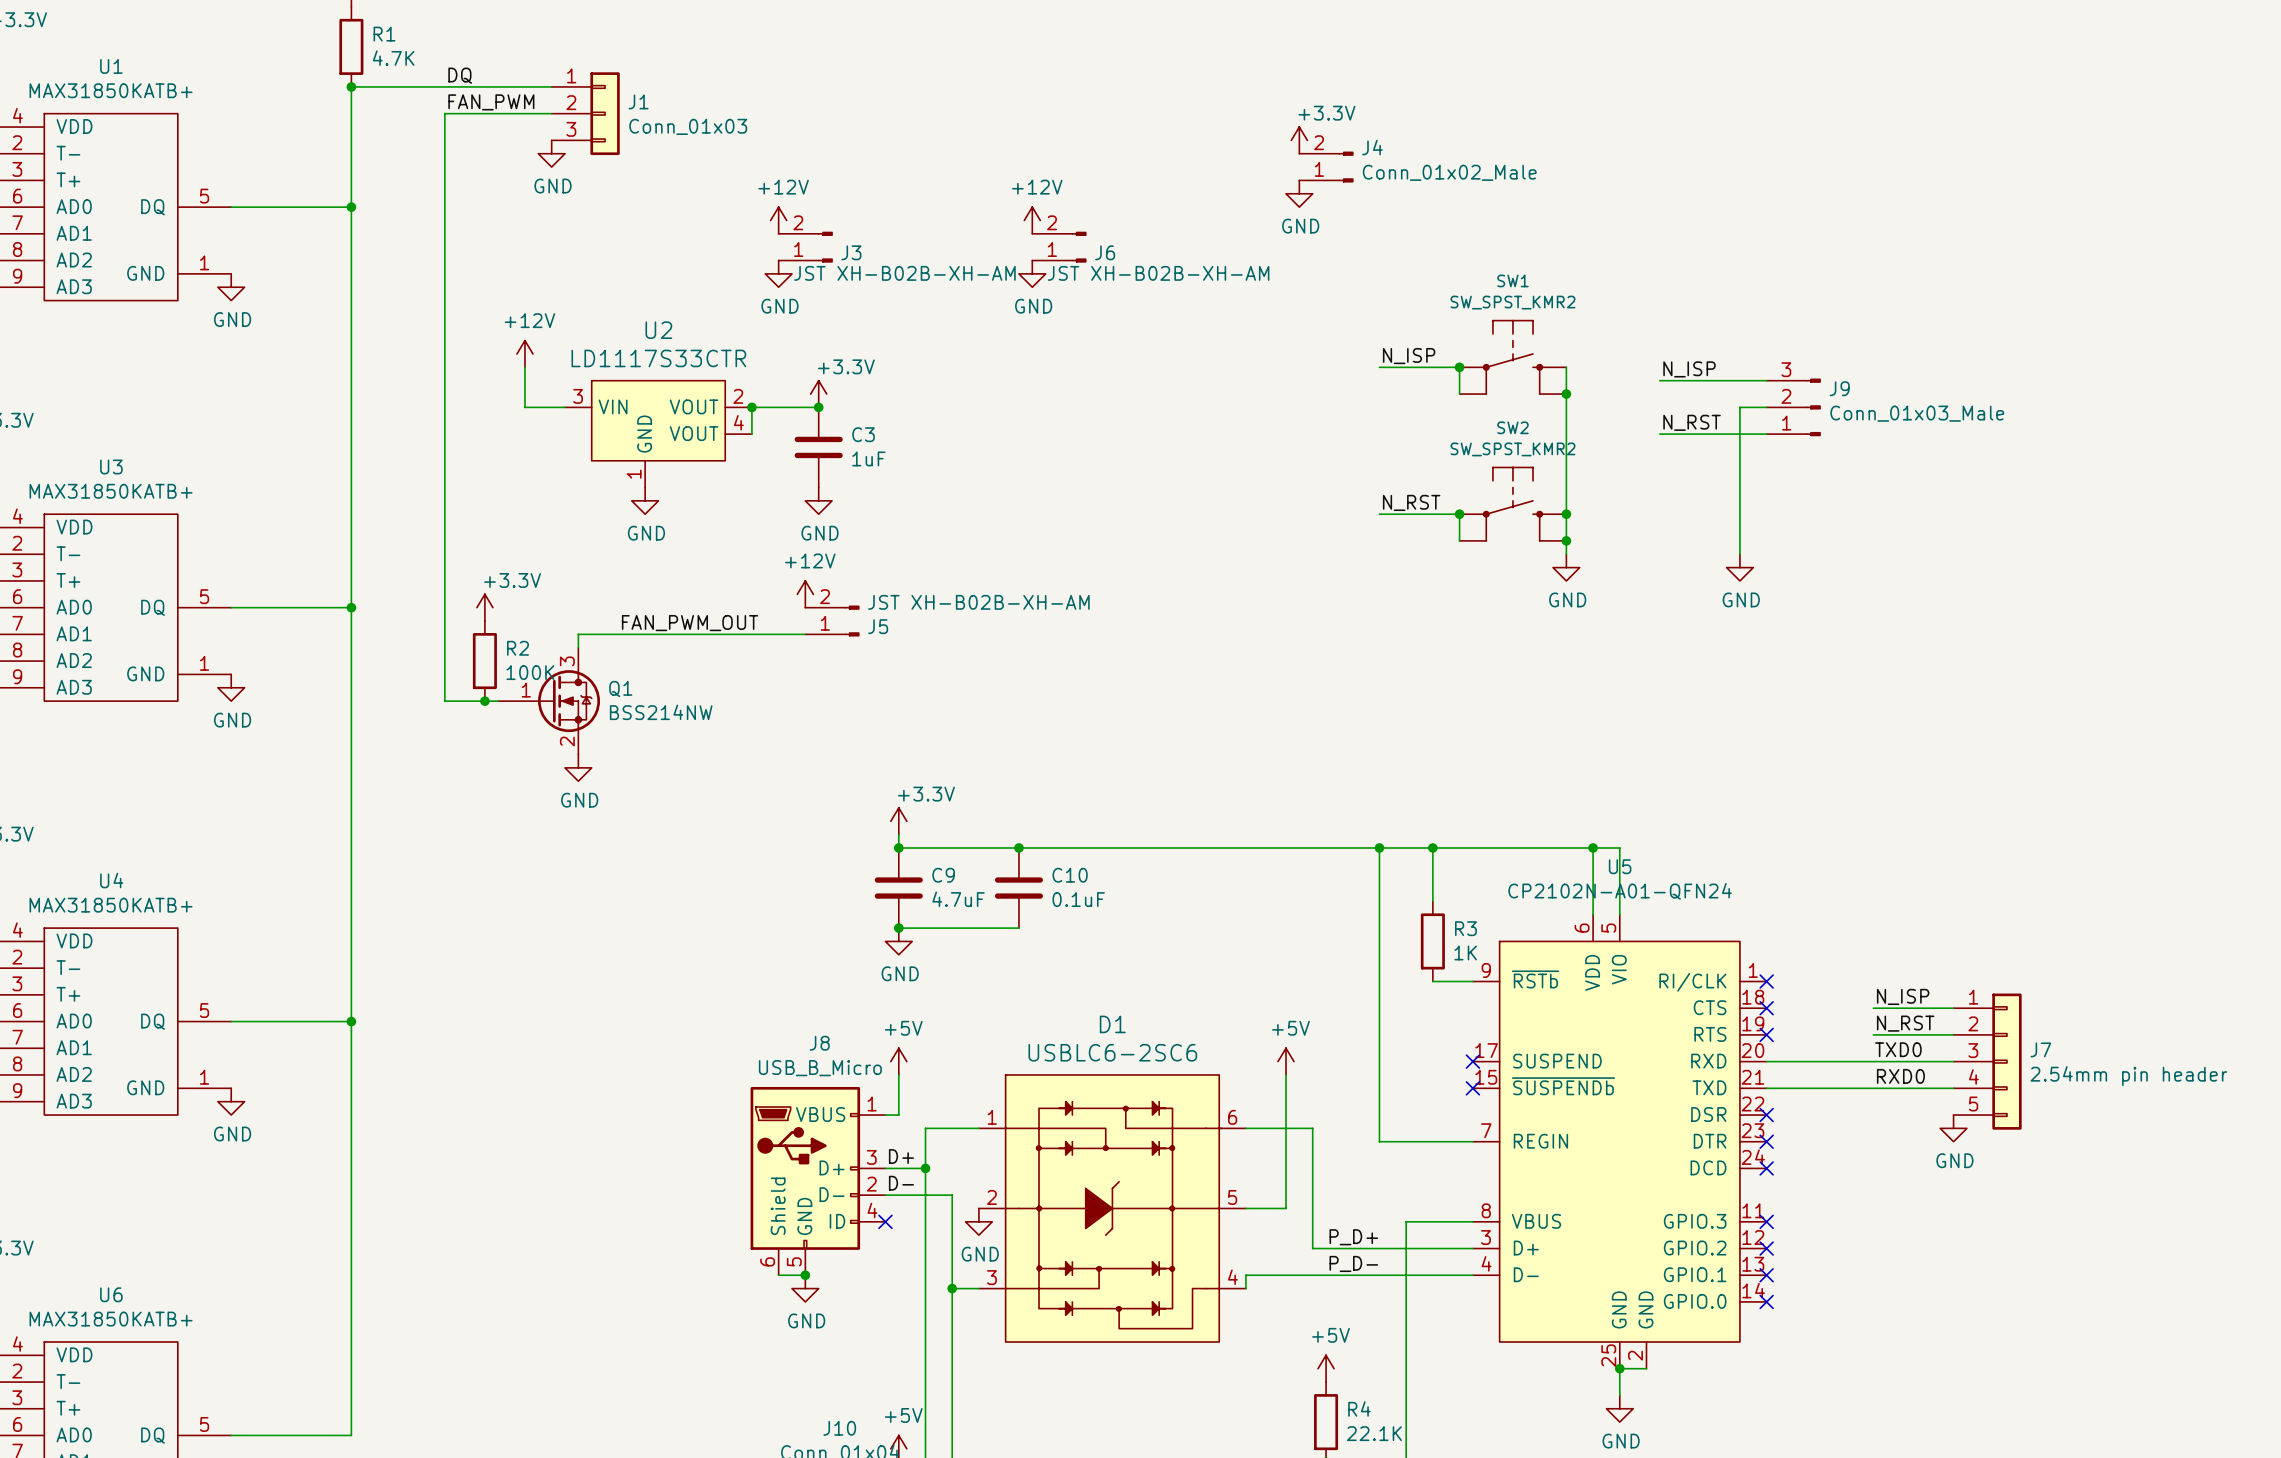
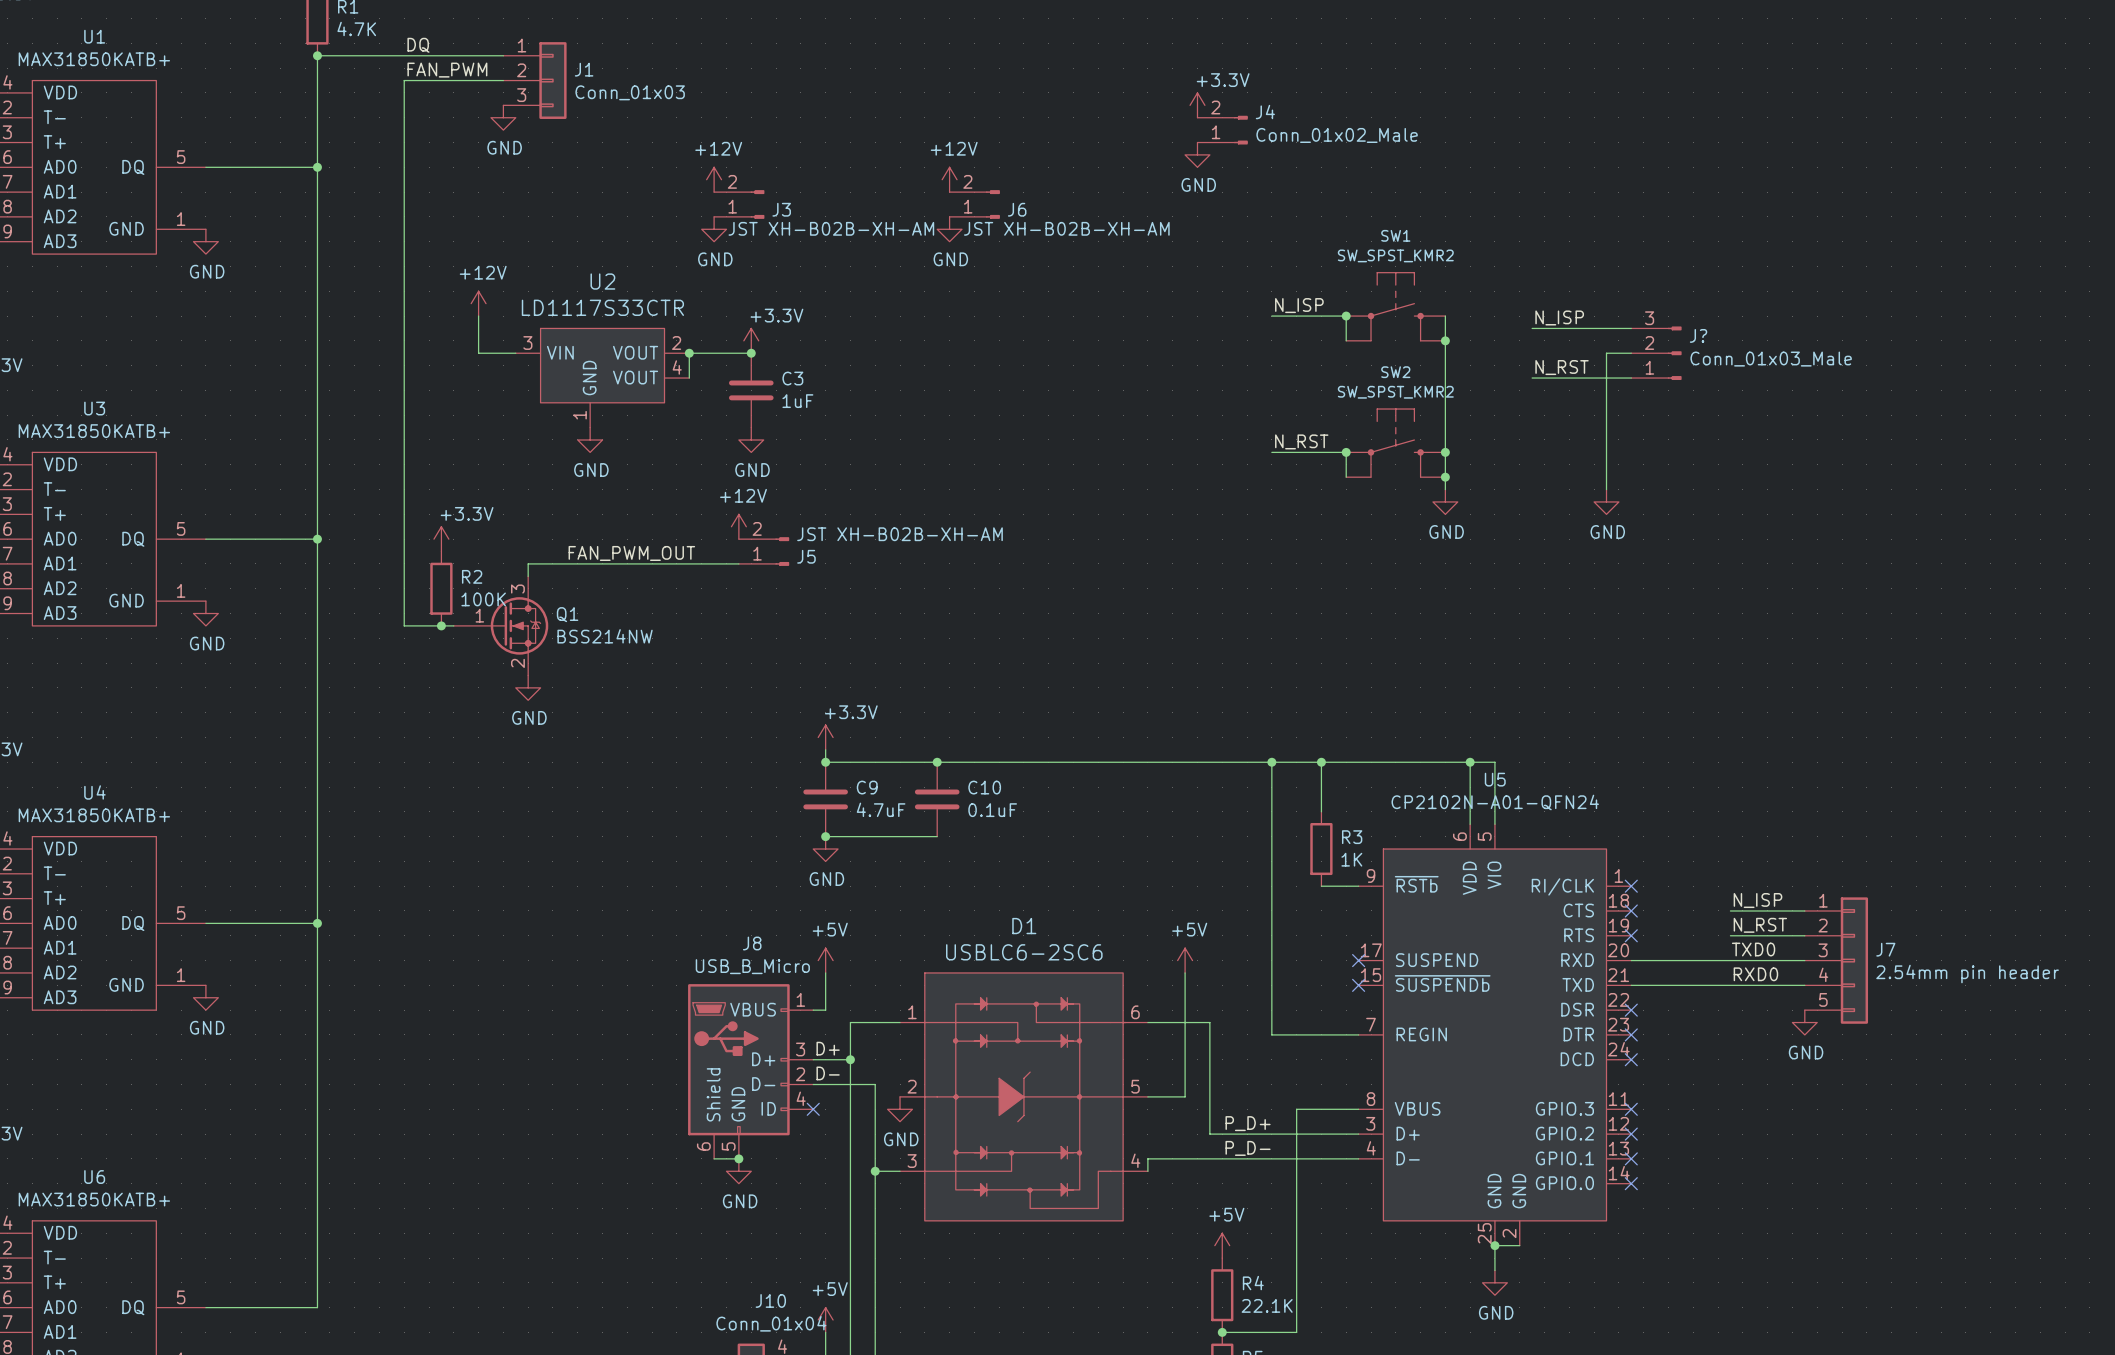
J9 name: J9 (1839, 388) -> J? (1698, 335)

